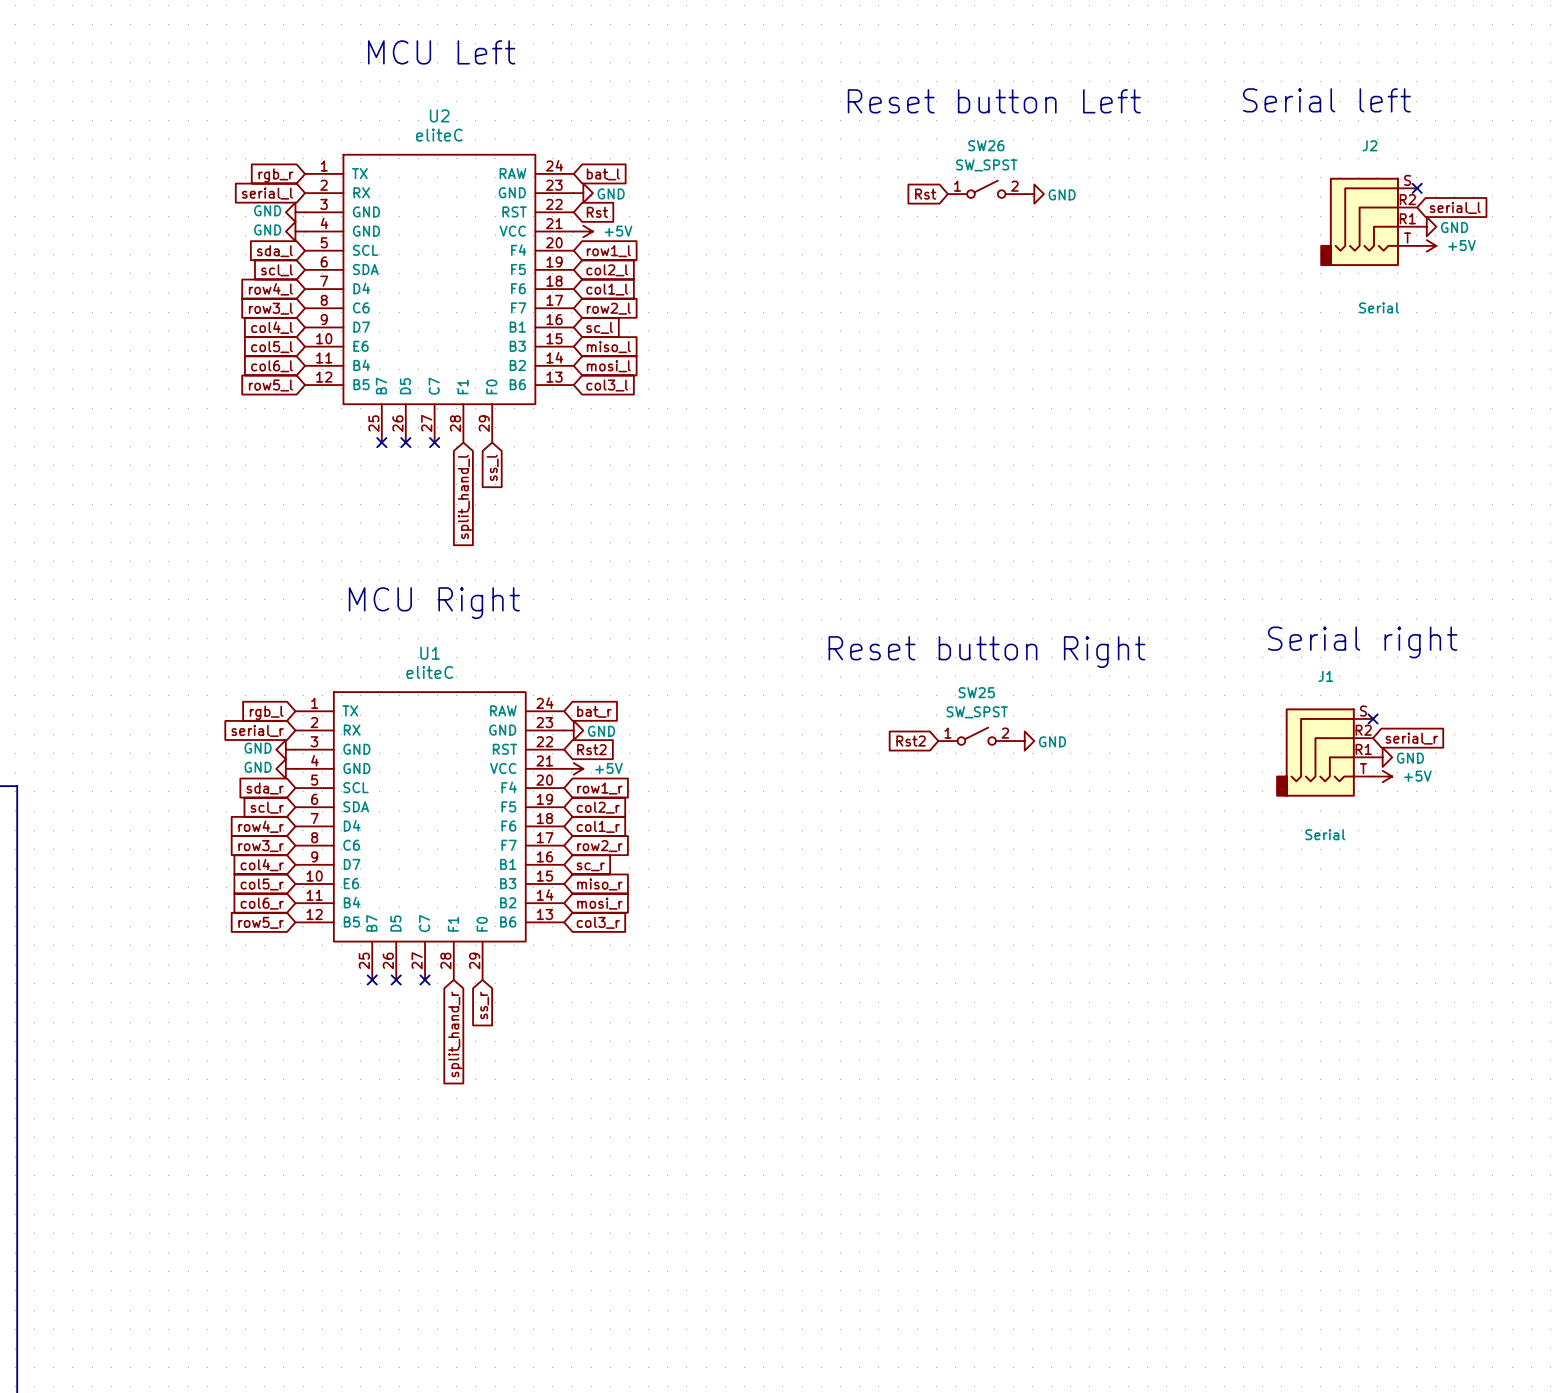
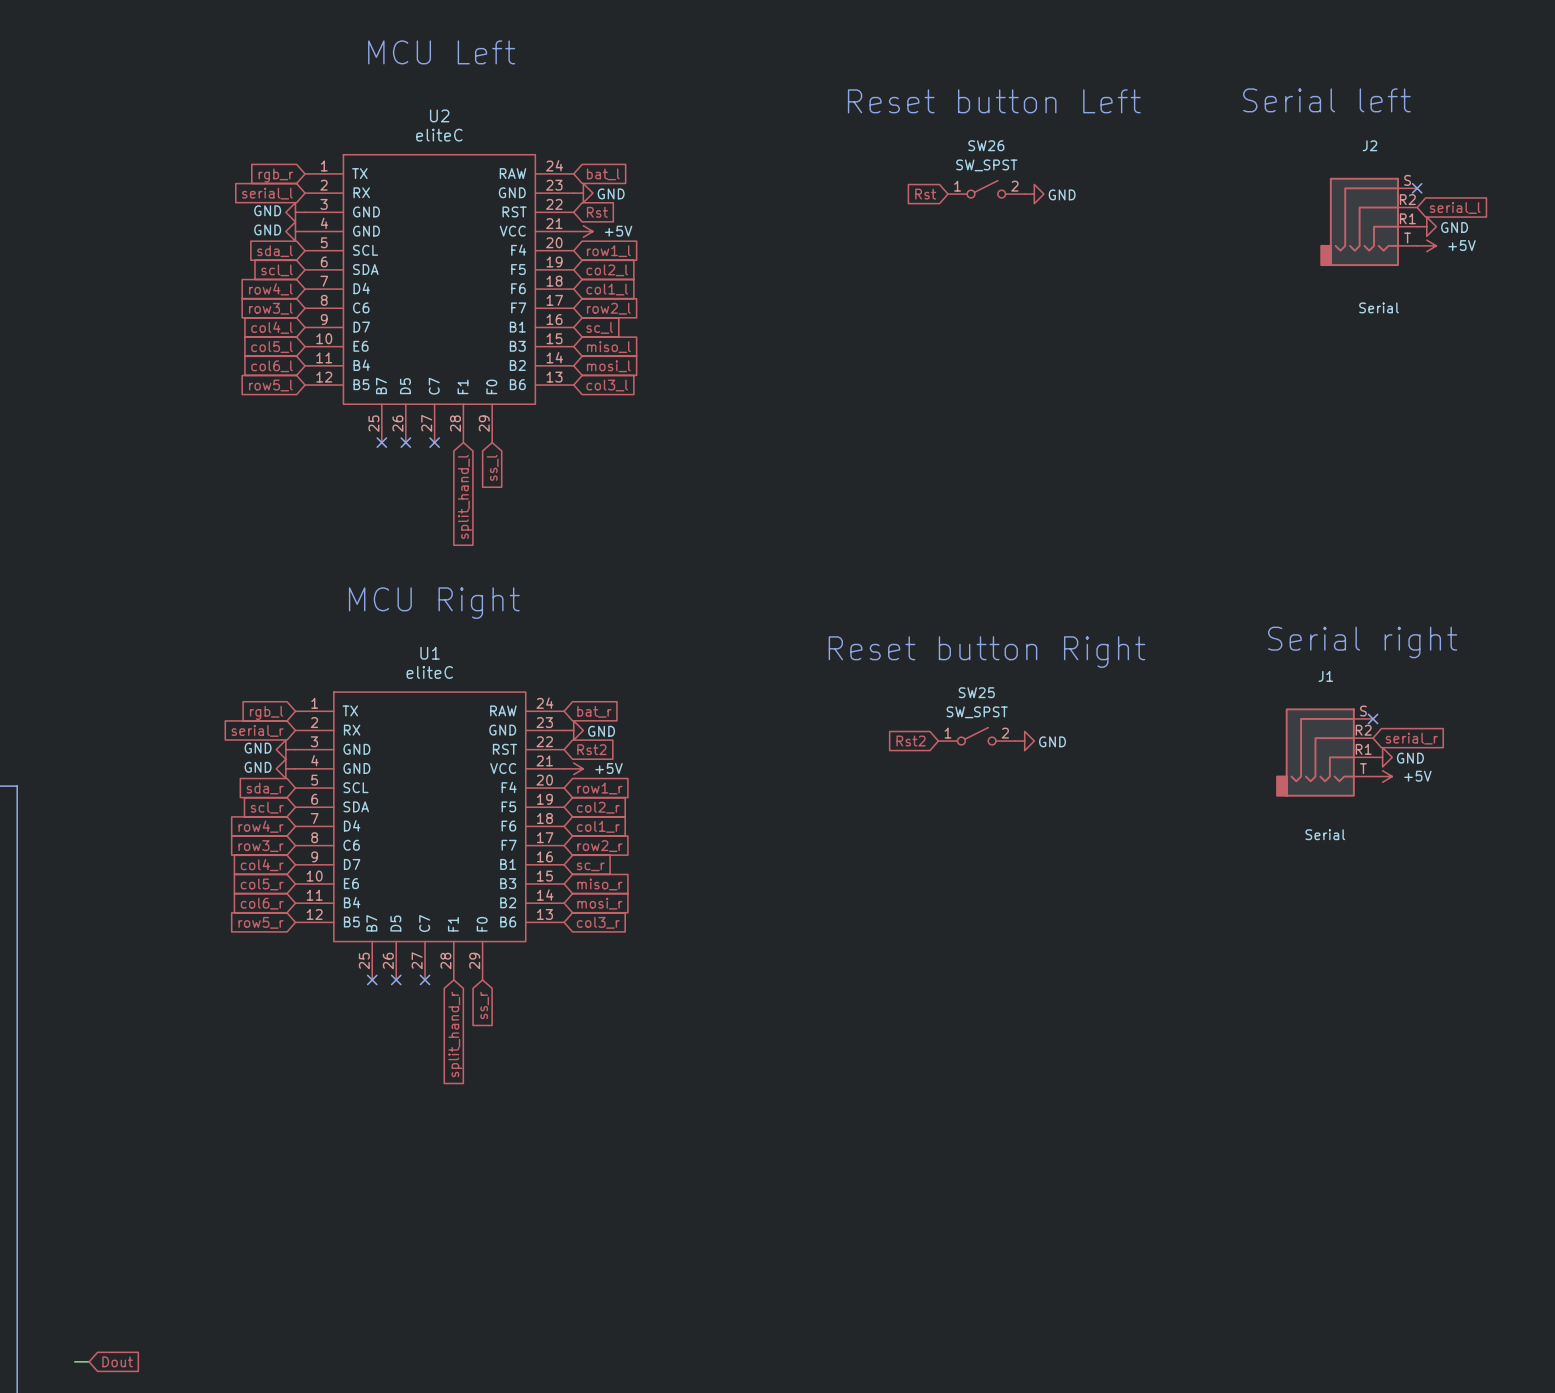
wire: none -> (74, 1361) (89, 1361)
global label: none -> Dout (117, 1361)

